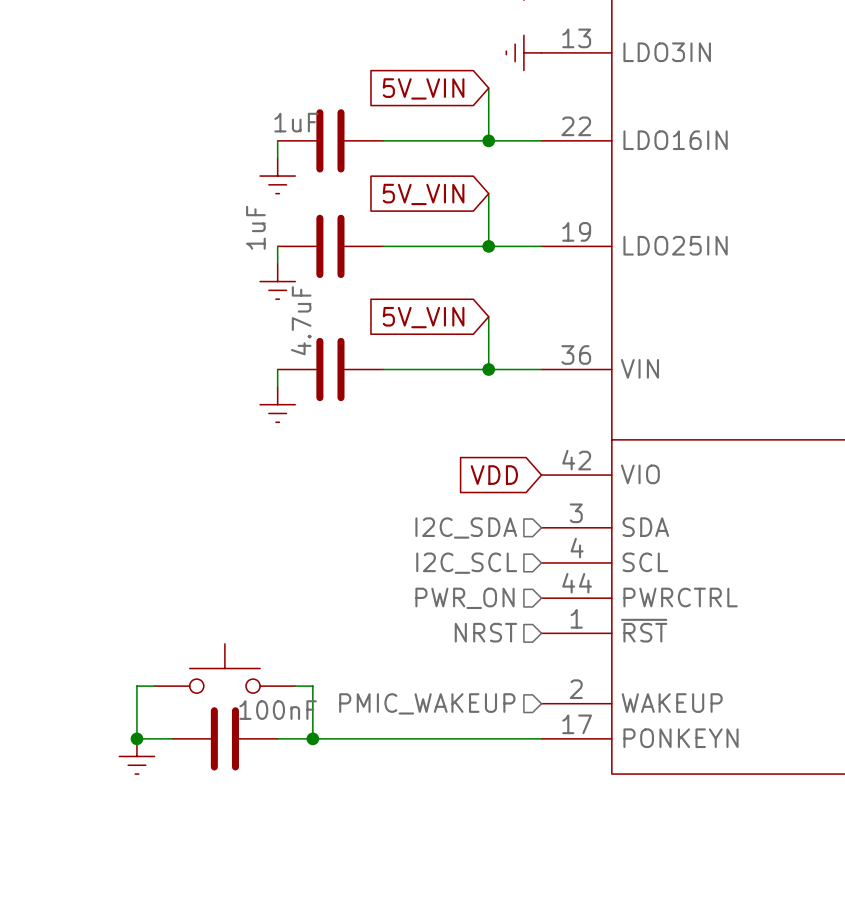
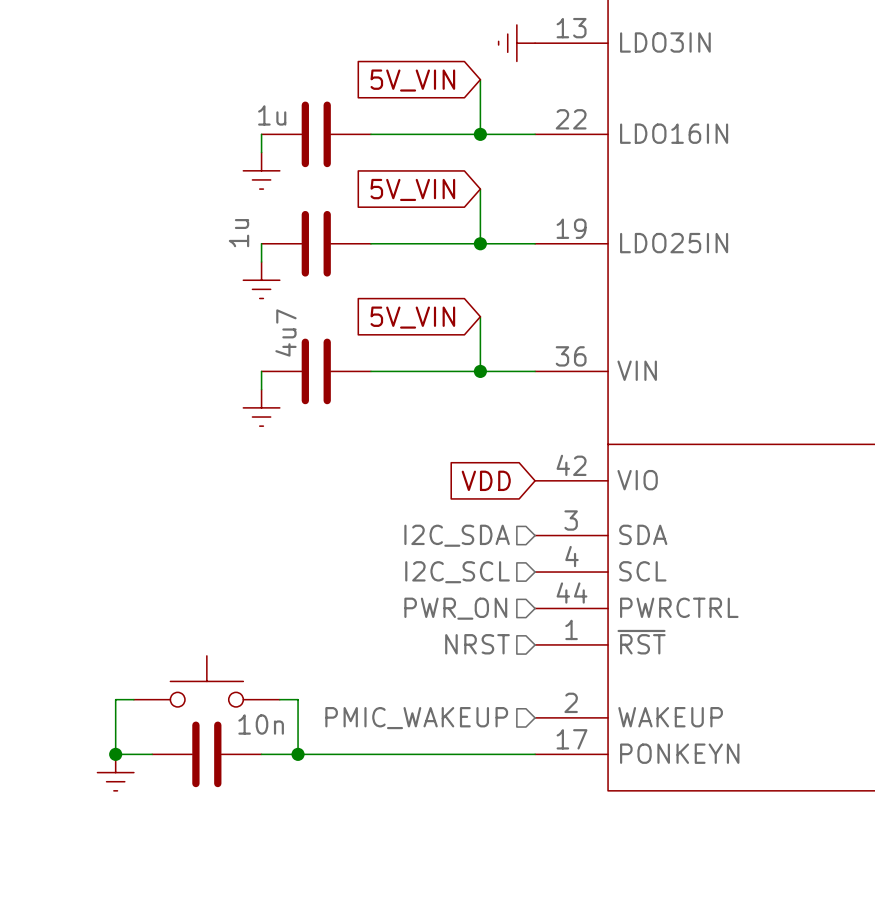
part value: 1uF (296, 122) -> 1u (272, 115)
part value: 1uF (255, 227) -> 1u (239, 233)
part value: 4.7uF (301, 320) -> 4u7 (285, 332)
part value: 100nF (278, 710) -> 10n (261, 724)

